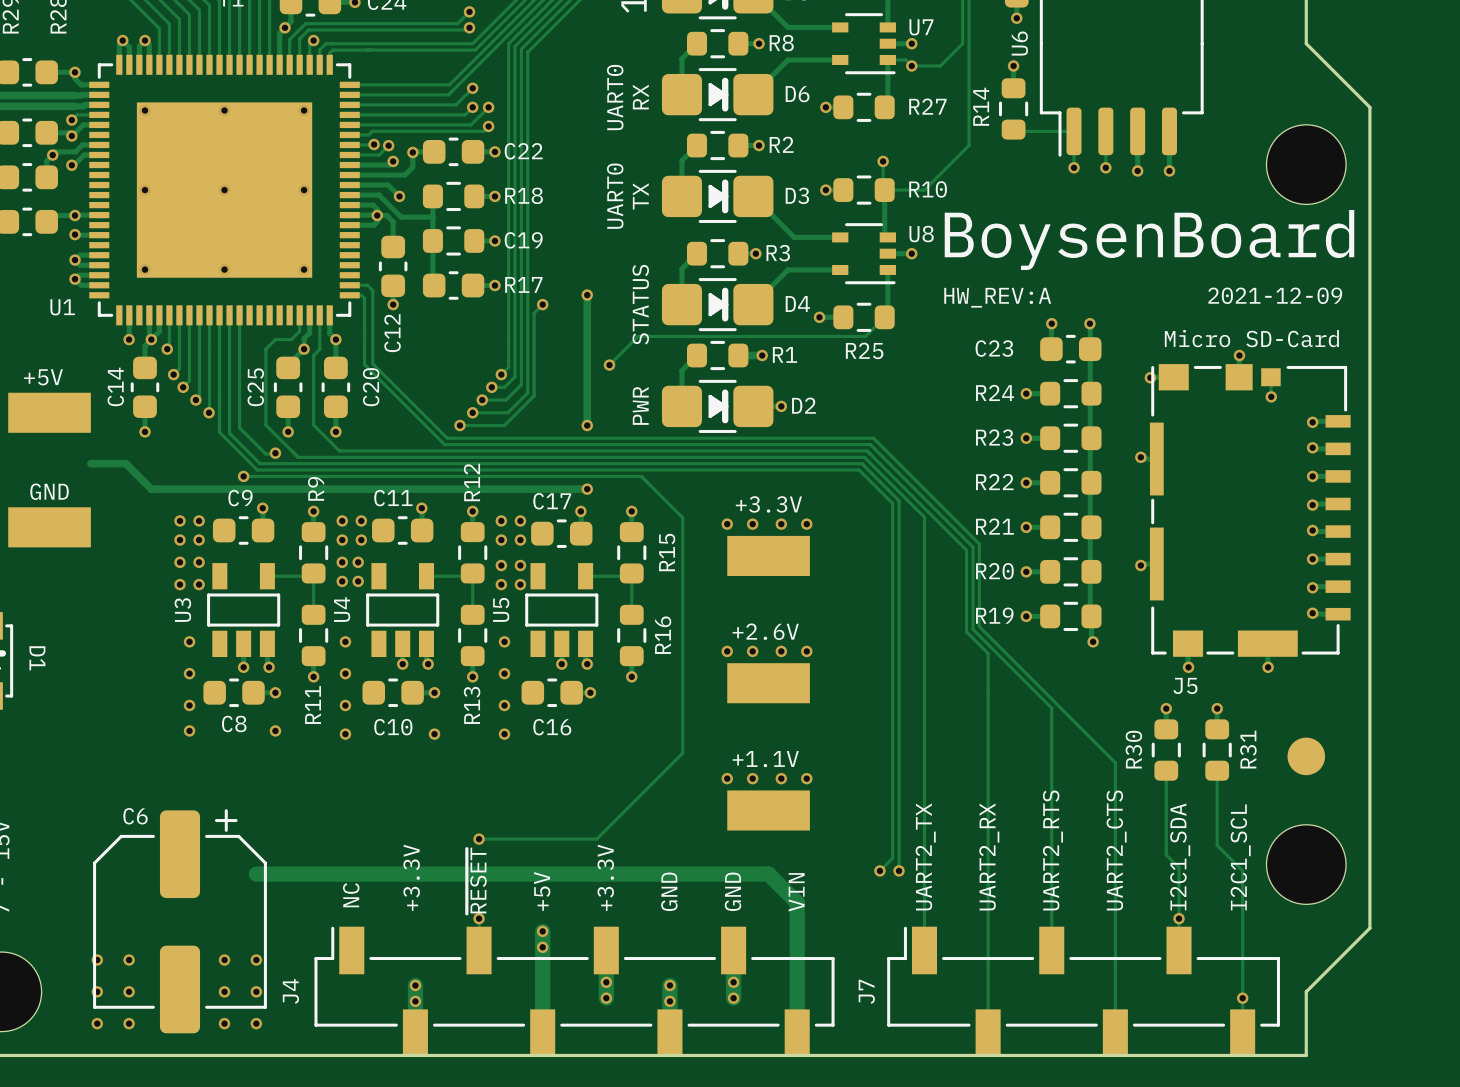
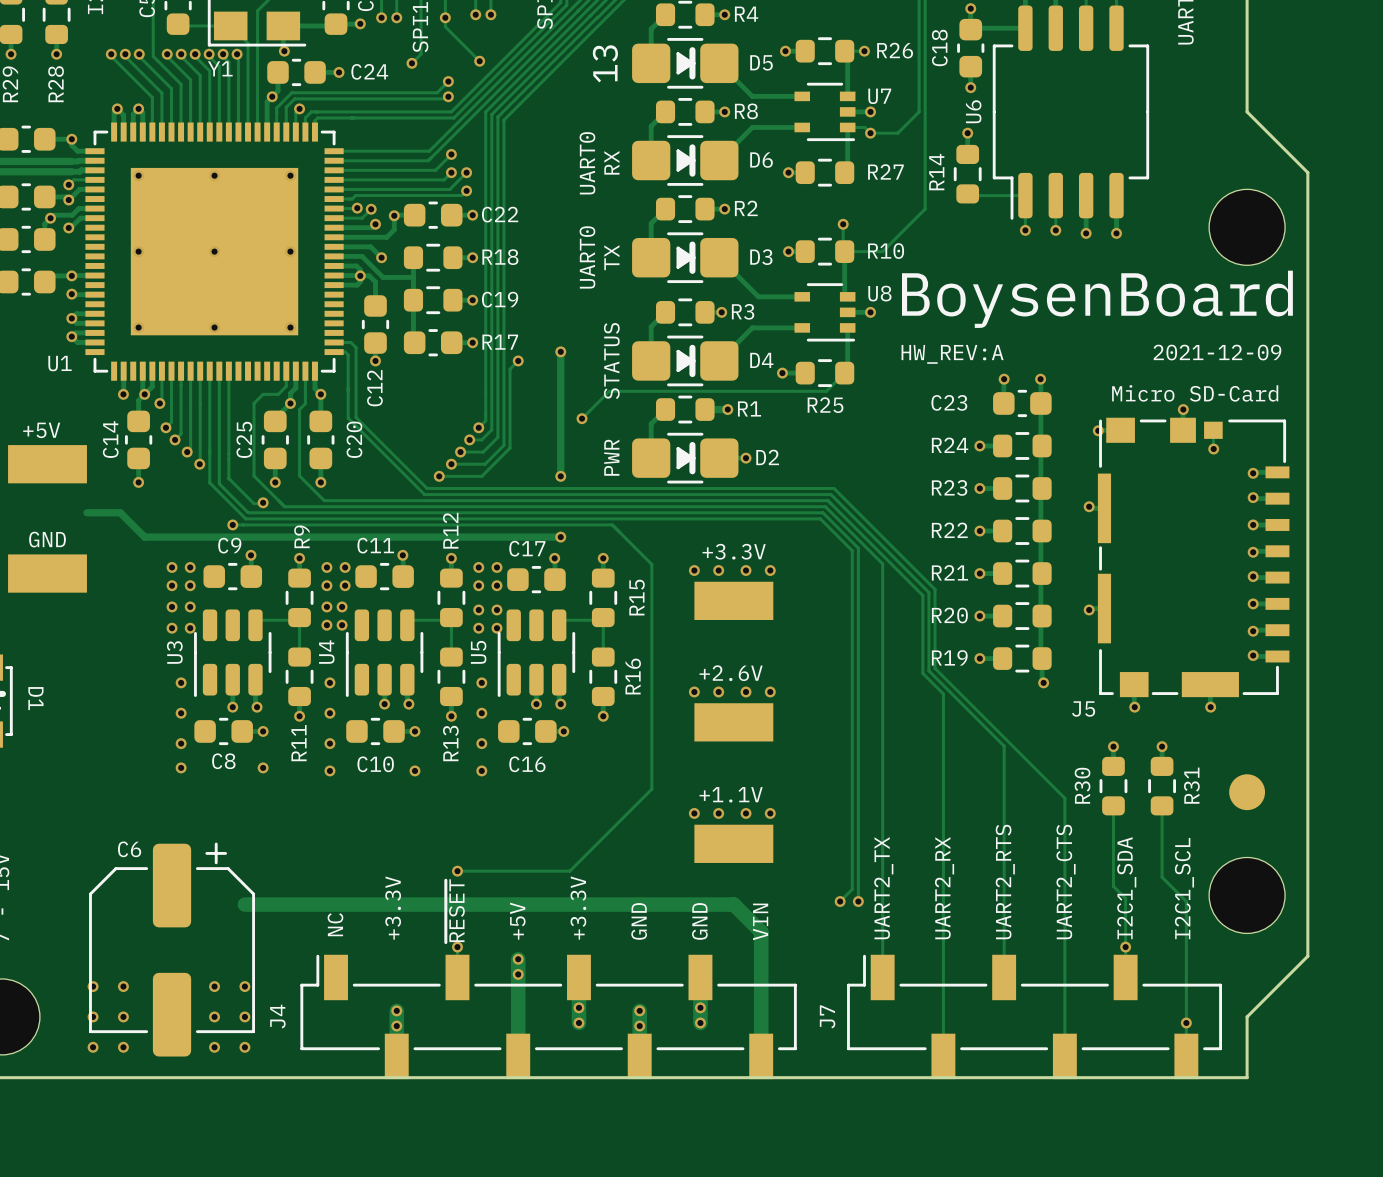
U3 footprint: [207, 563, 281, 658] -> [194, 609, 272, 697]
U4 footprint: [366, 563, 440, 658] -> [345, 609, 424, 697]
U5 footprint: [525, 563, 599, 658] -> [497, 609, 576, 697]
J5 name position: J5 (1185, 685) -> J5 (1083, 708)

